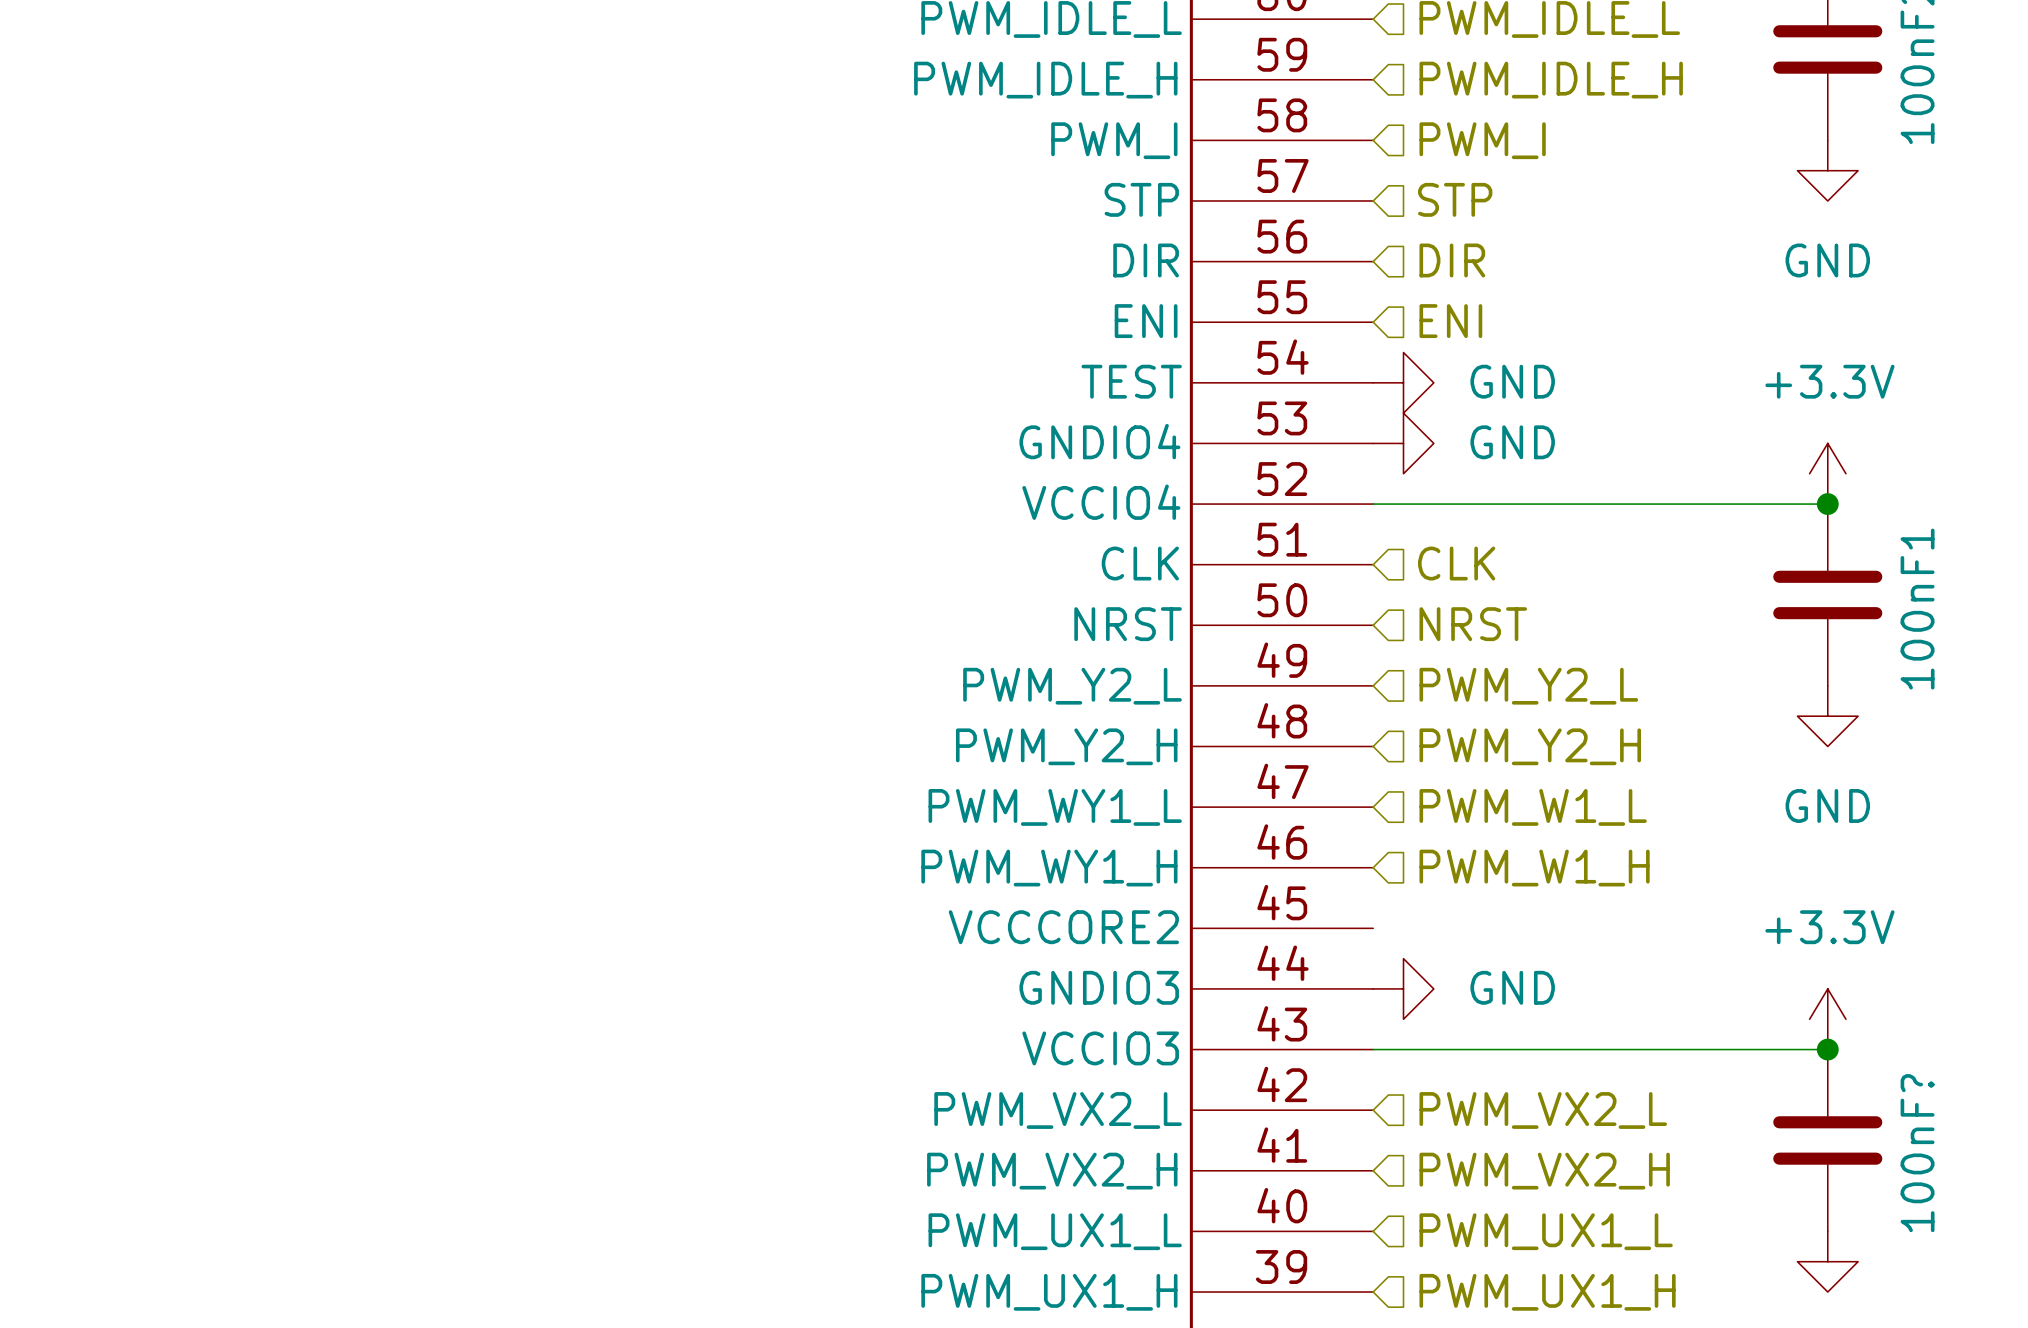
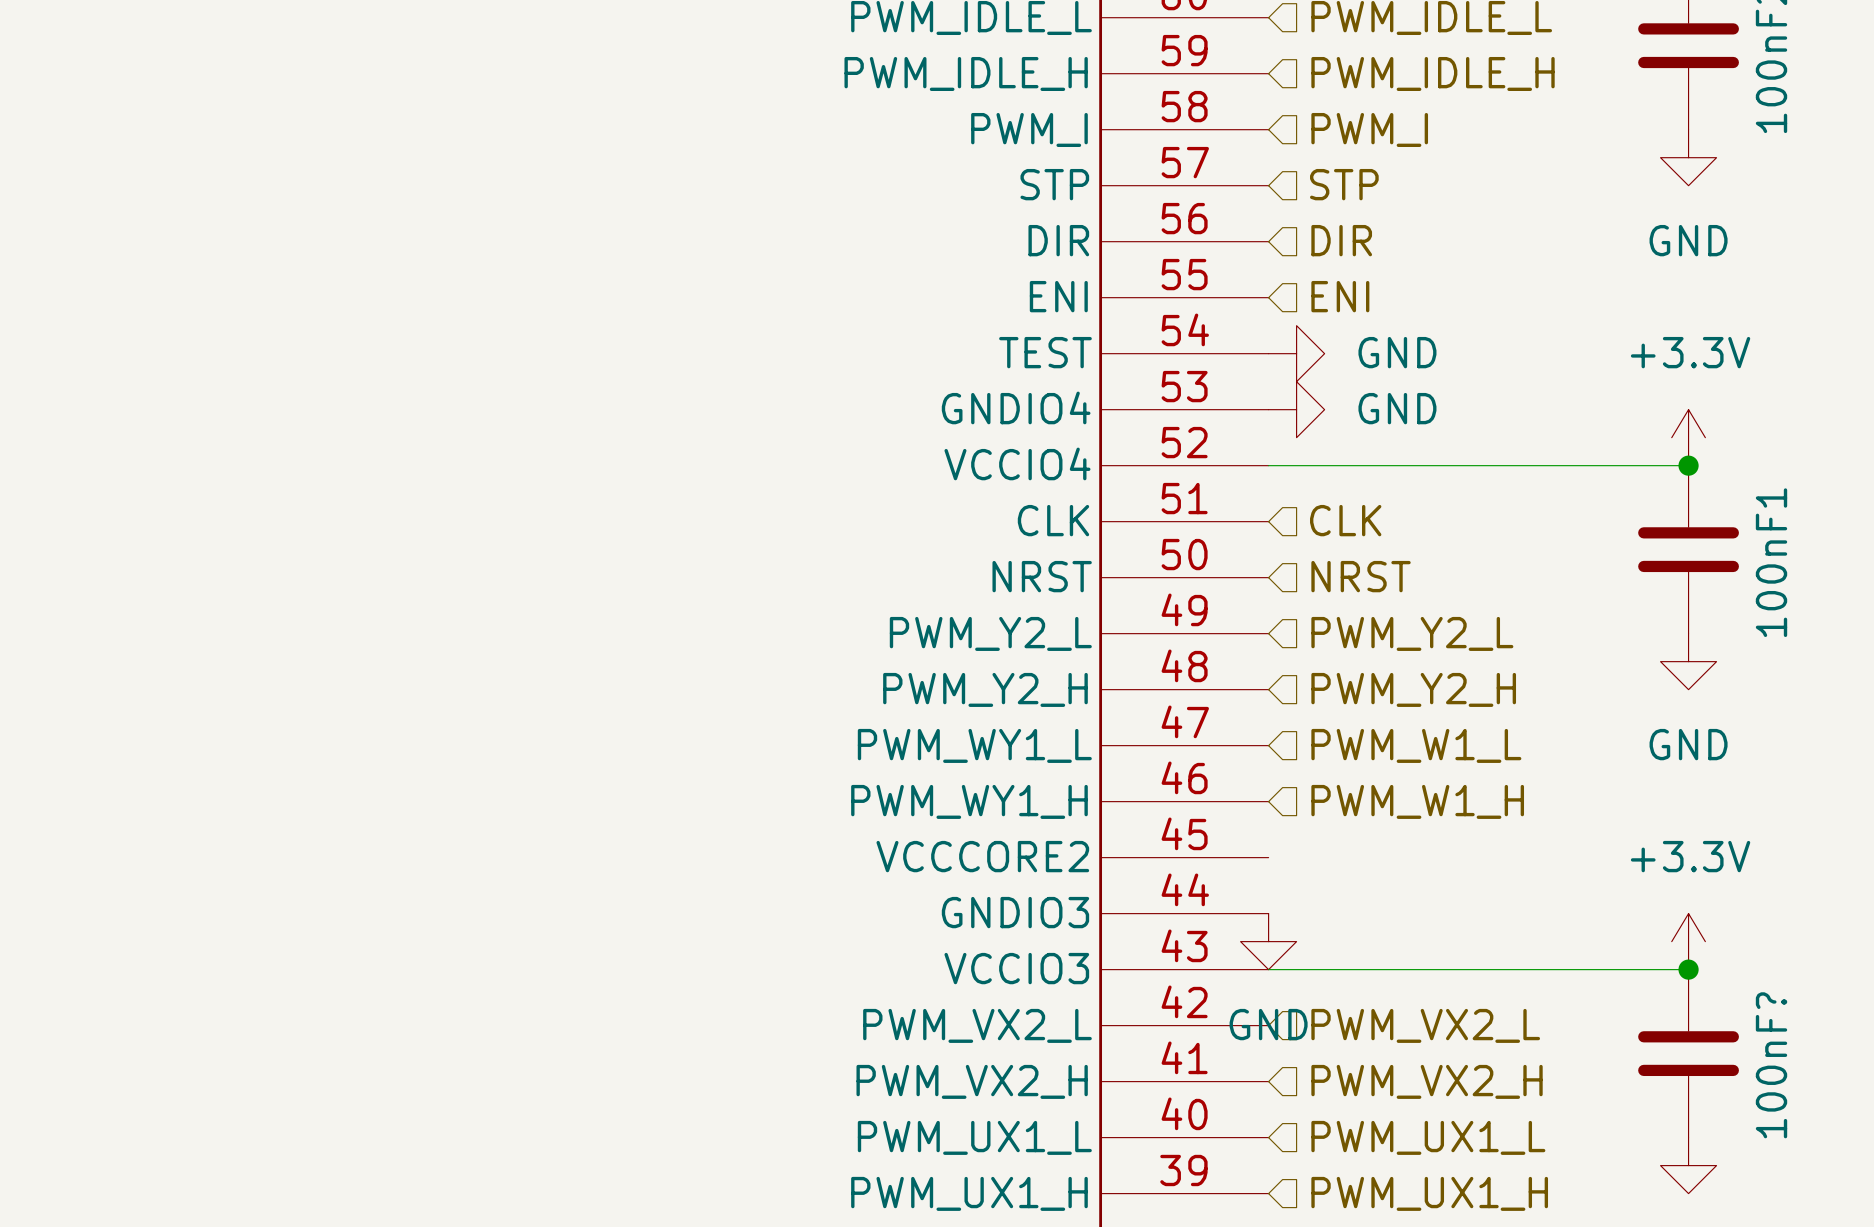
power symbol rotation: 0° (1403, 988) -> 90° clockwise (1268, 941)
power symbol position: GND (1403, 988) -> GND (1268, 941)

